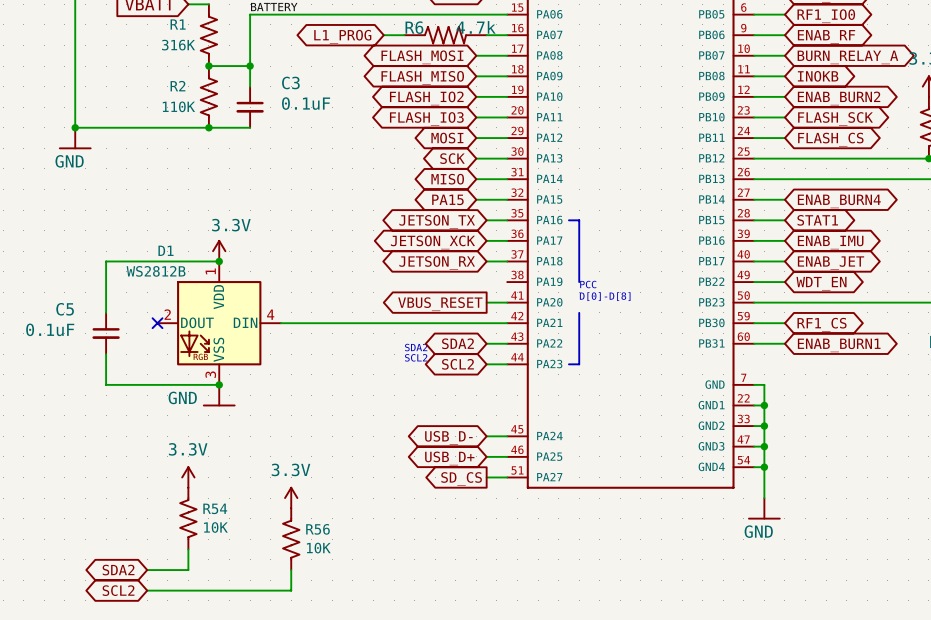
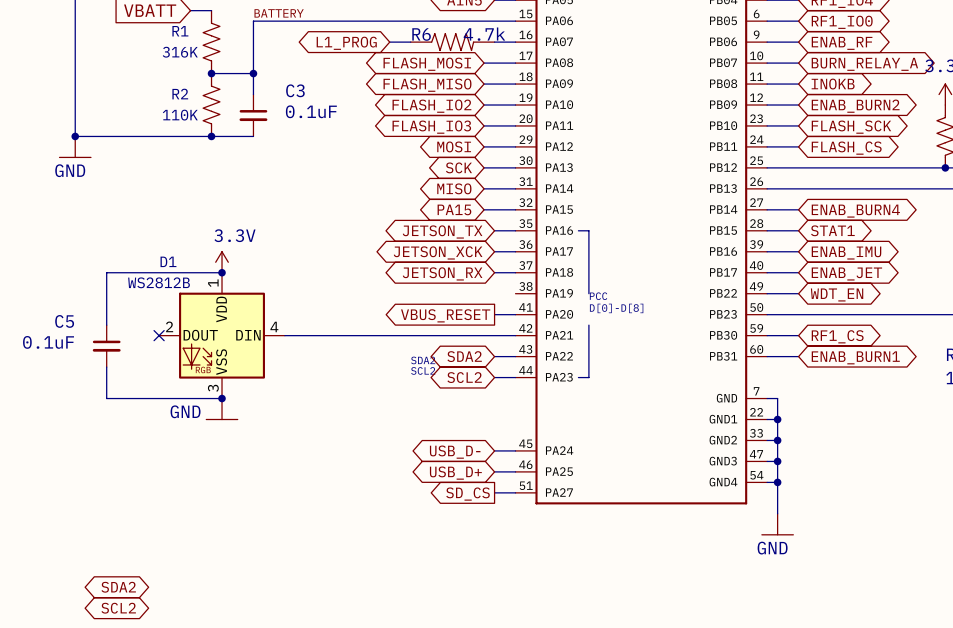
power symbol: 3.3V (188, 477) -> none
power symbol: 3.3V (291, 498) -> none
R54: 10K (188, 518) -> none
R56: 10K (291, 539) -> none
wire: (188, 549) (188, 570) (147, 570) -> none
wire: (291, 570) (291, 590) (147, 590) -> none

